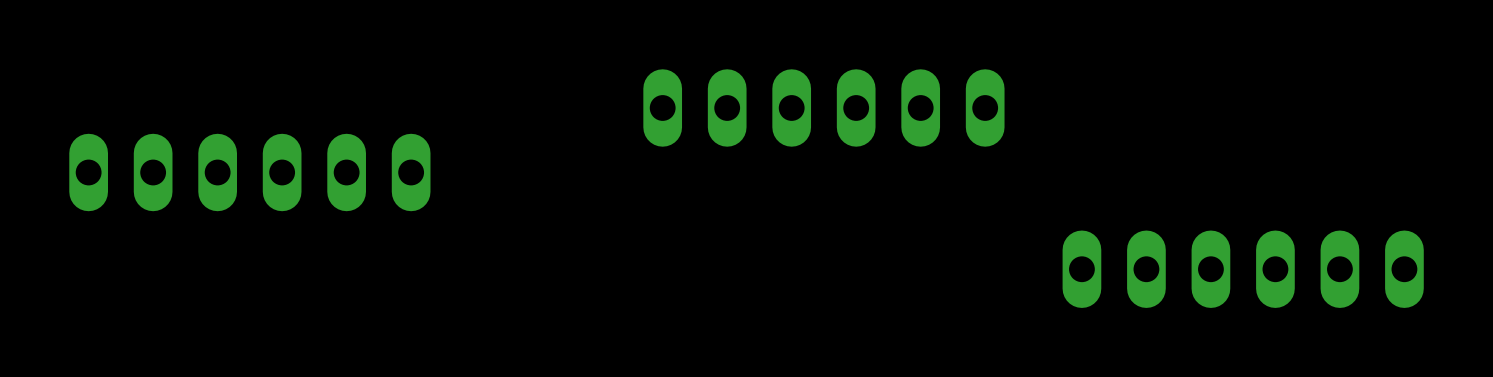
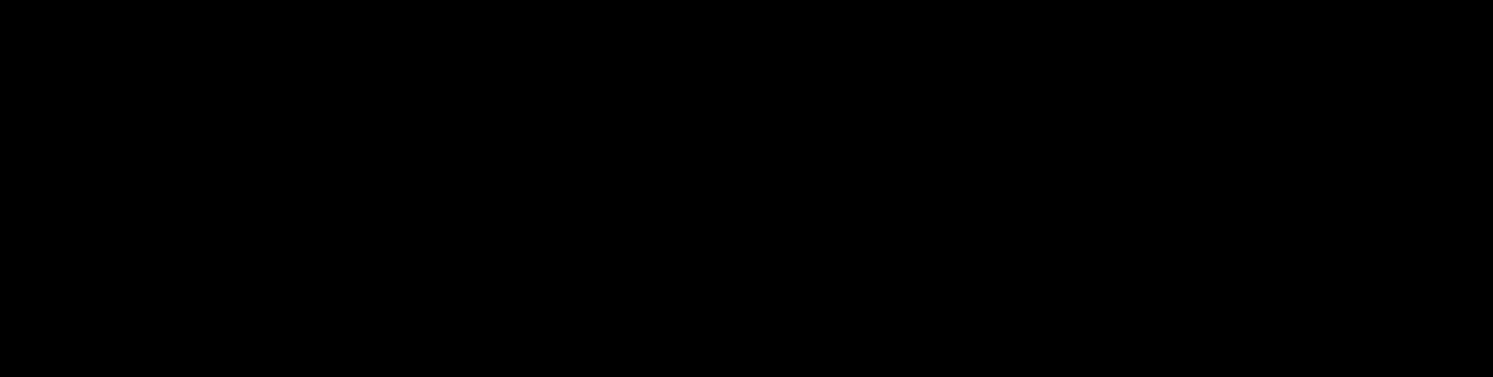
part: (823, 107) -> none
part: (249, 172) -> none
part: (1243, 269) -> none

